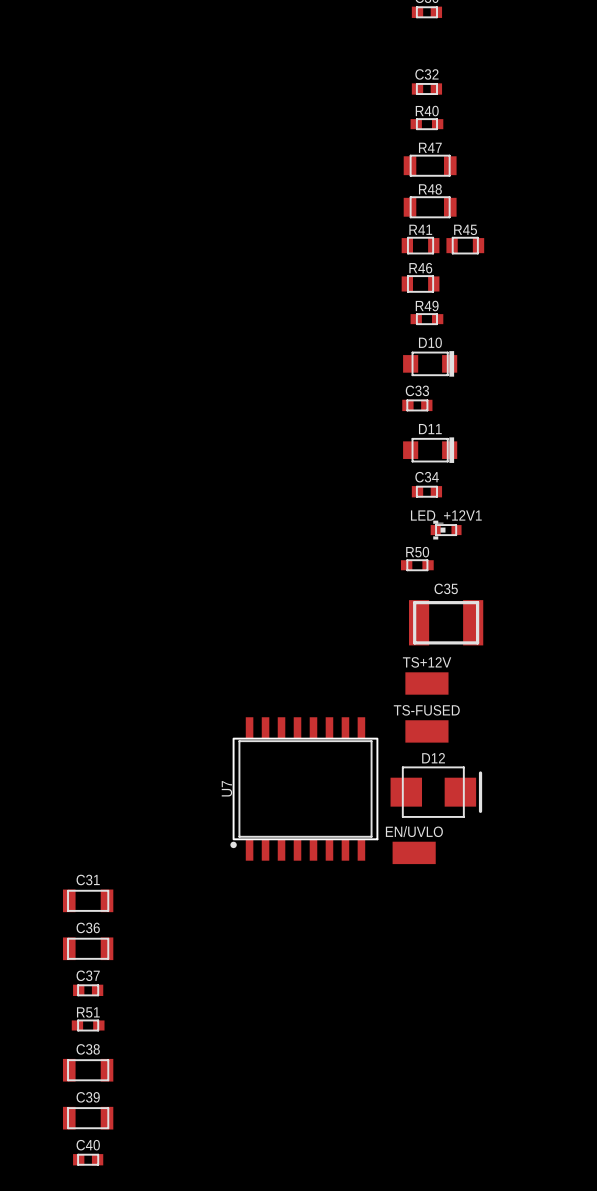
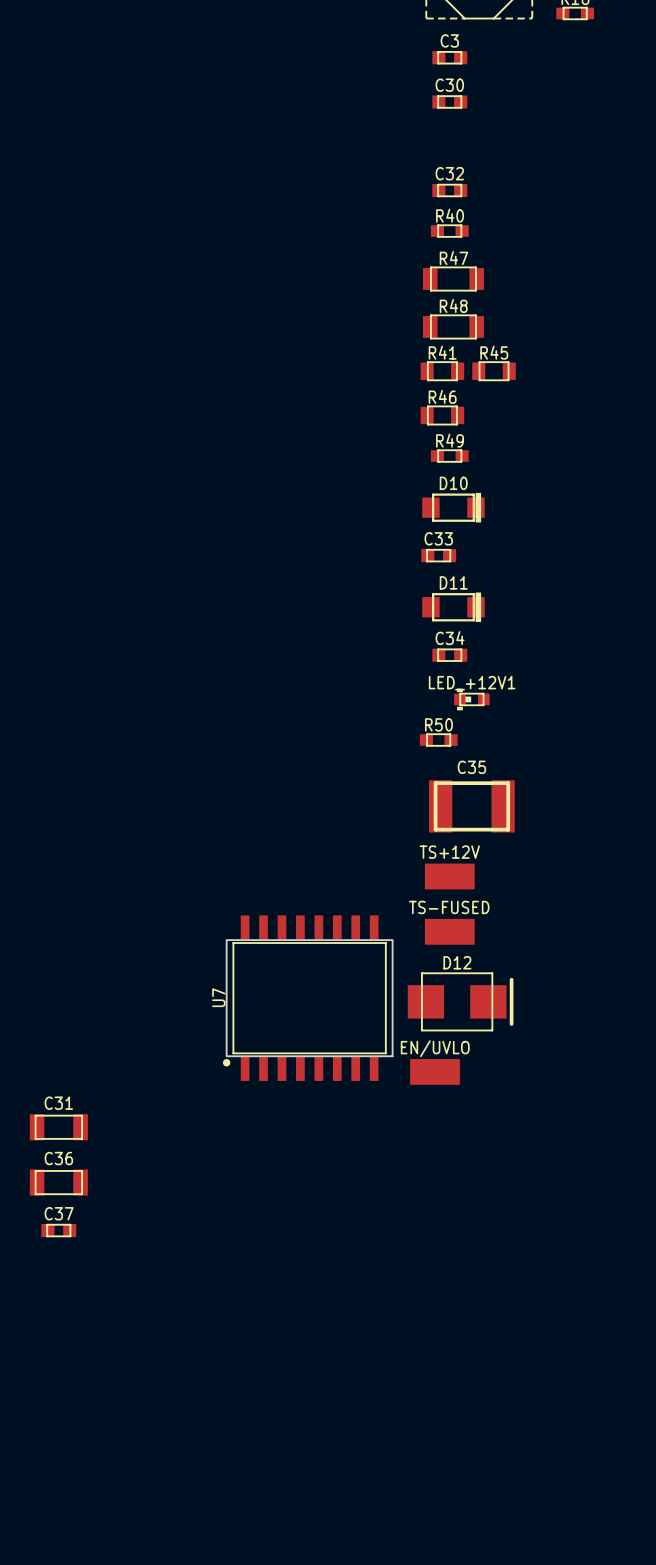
R51: (88, 1025) -> none
C38: (88, 1070) -> none
C39: (88, 1118) -> none
C40: (88, 1159) -> none

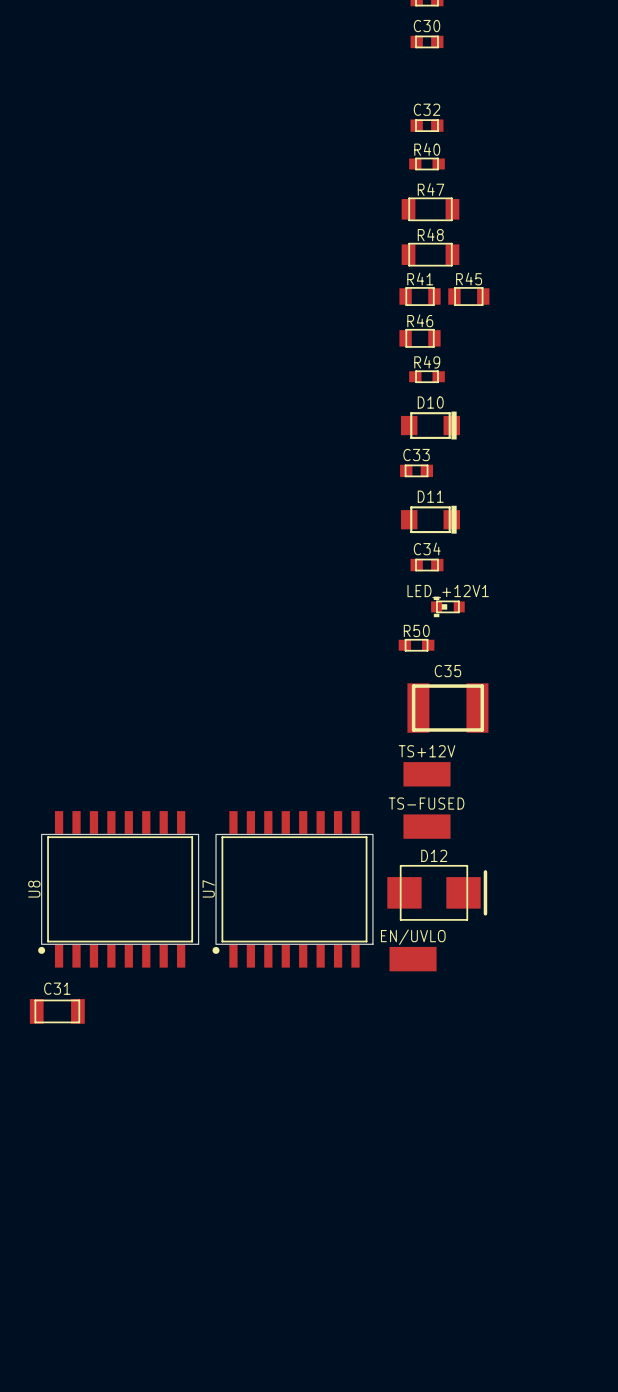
U8: none -> (118, 889)
C36: (58, 1182) -> none
C37: (58, 1230) -> none

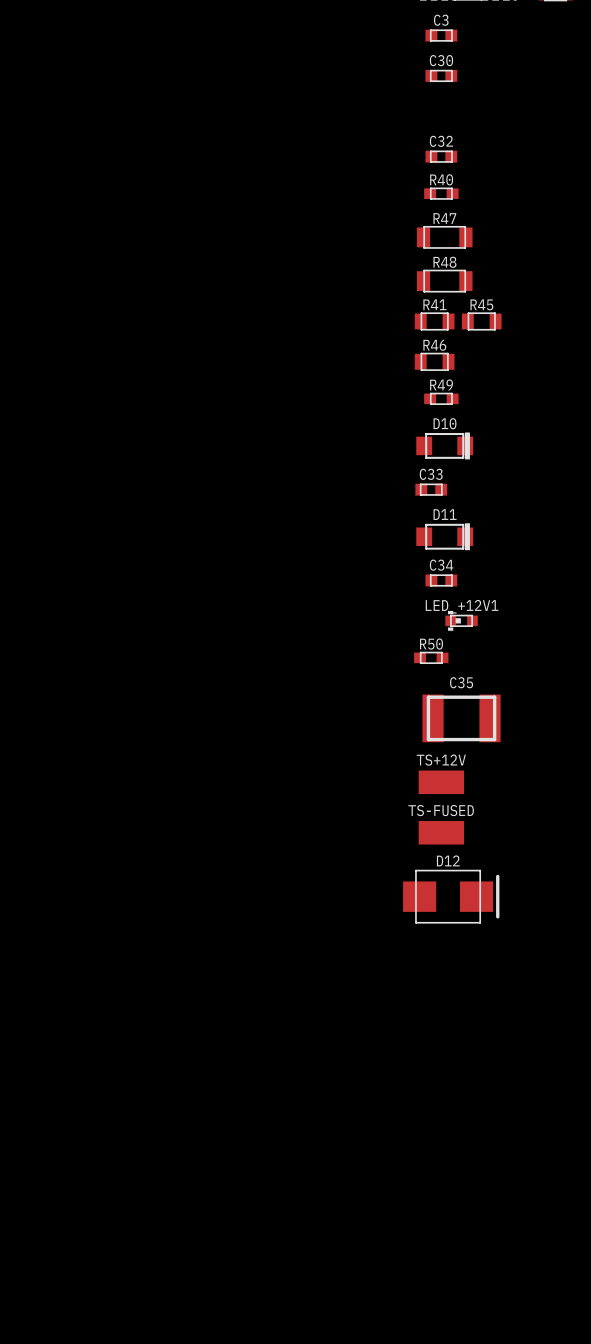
U8: (118, 889) -> none
U7: (292, 889) -> none
EN/UVLO: (413, 959) -> none
C31: (57, 1011) -> none

